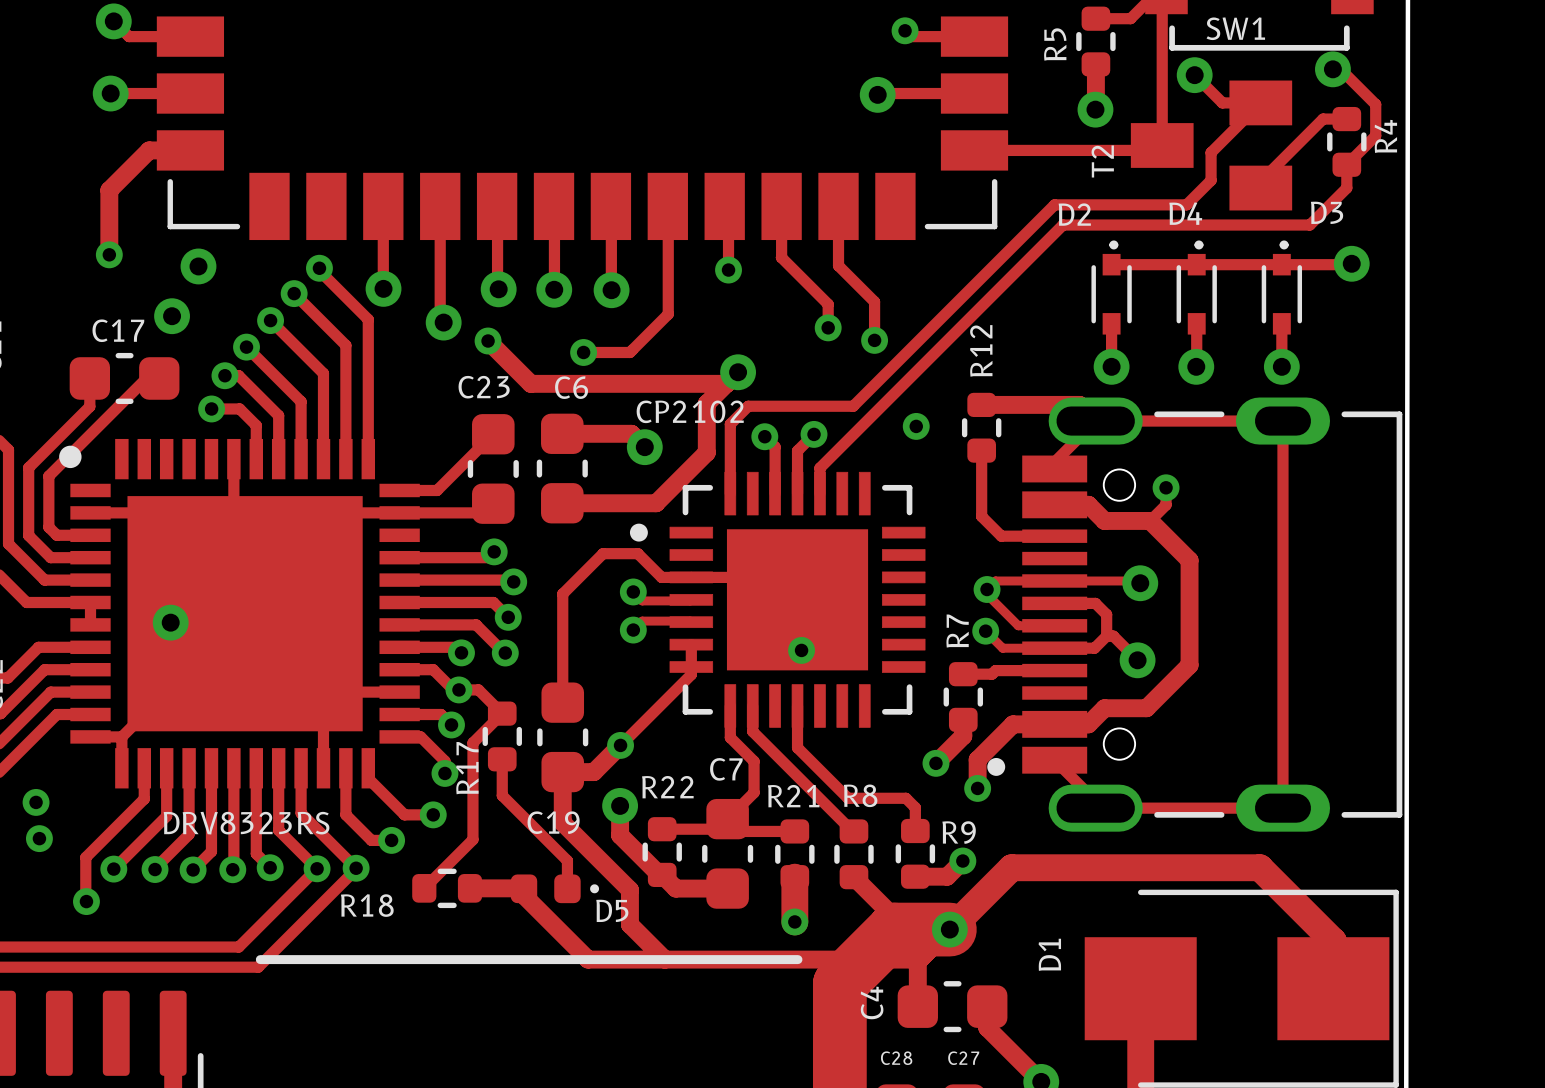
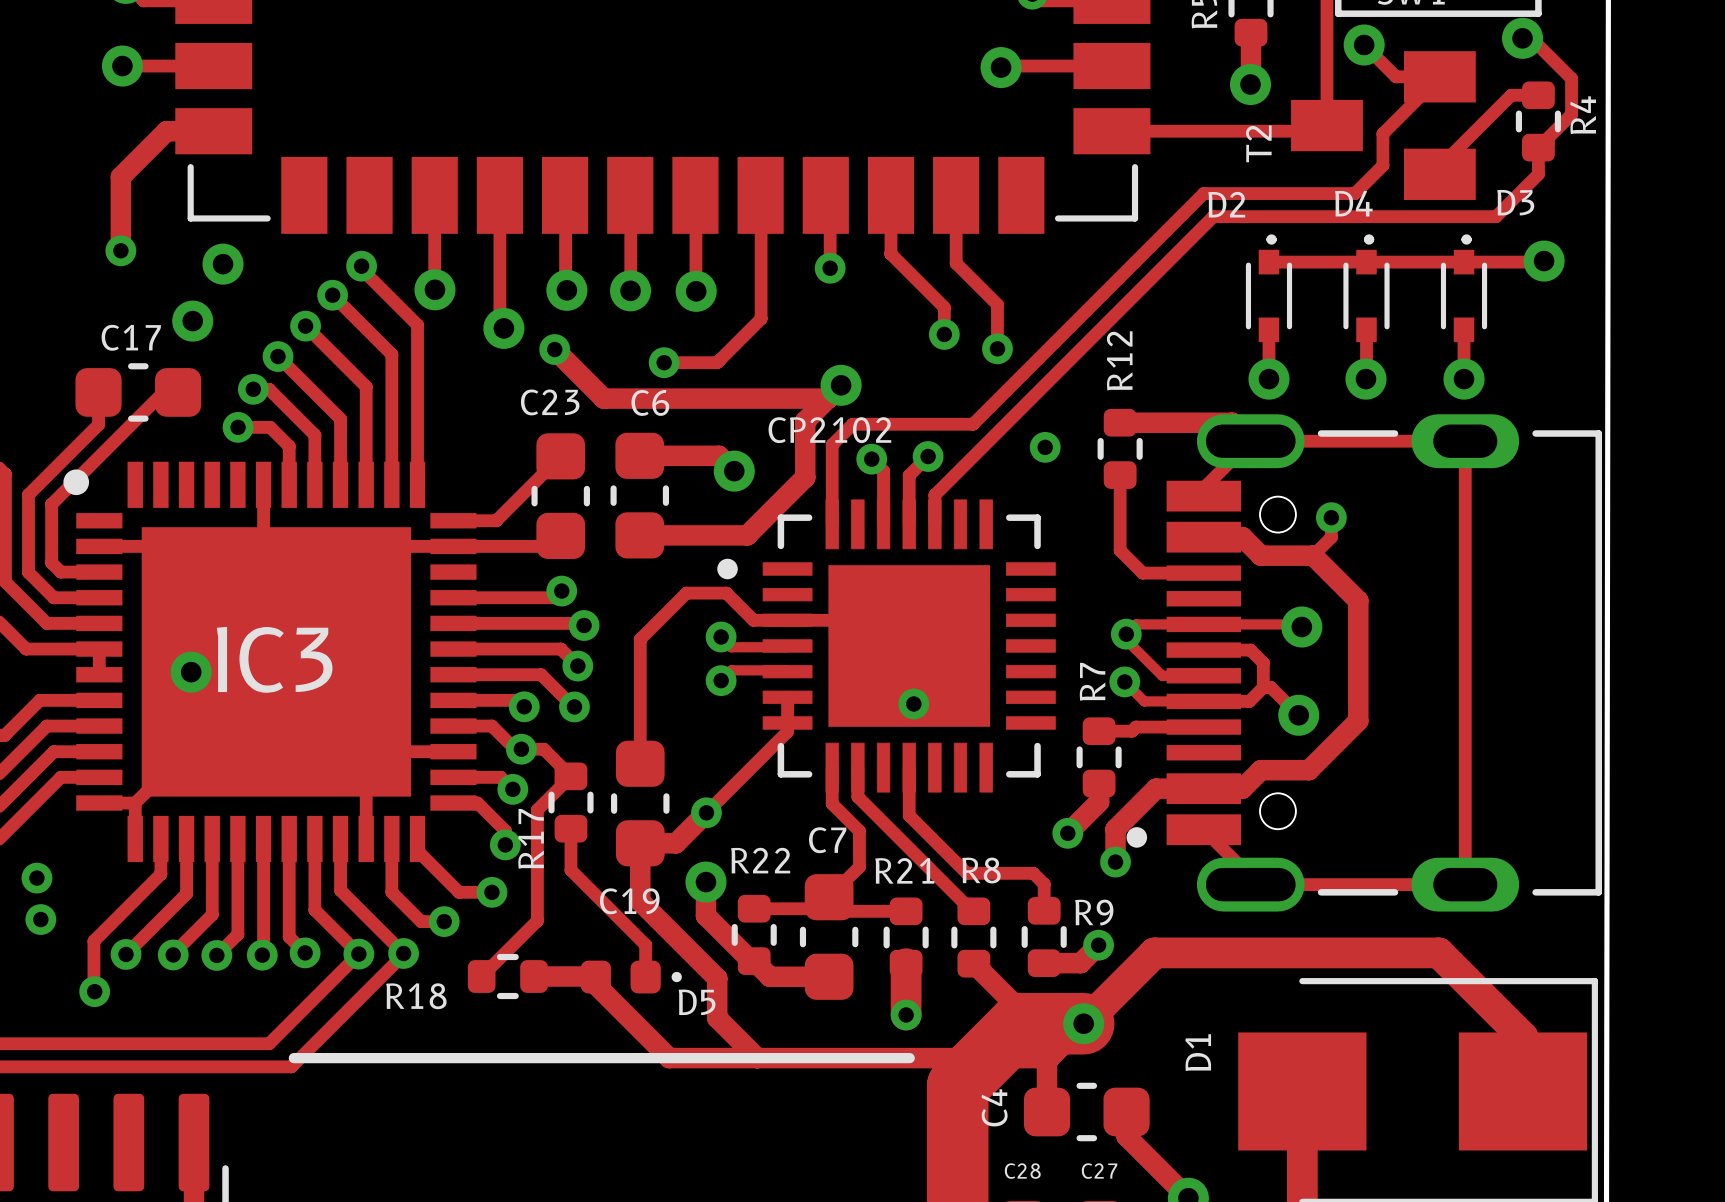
CP2102 name position: CP2102 (690, 411) -> CP2102 (829, 430)
DRV8323RS name: DRV8323RS (246, 823) -> IC3 (274, 659)

